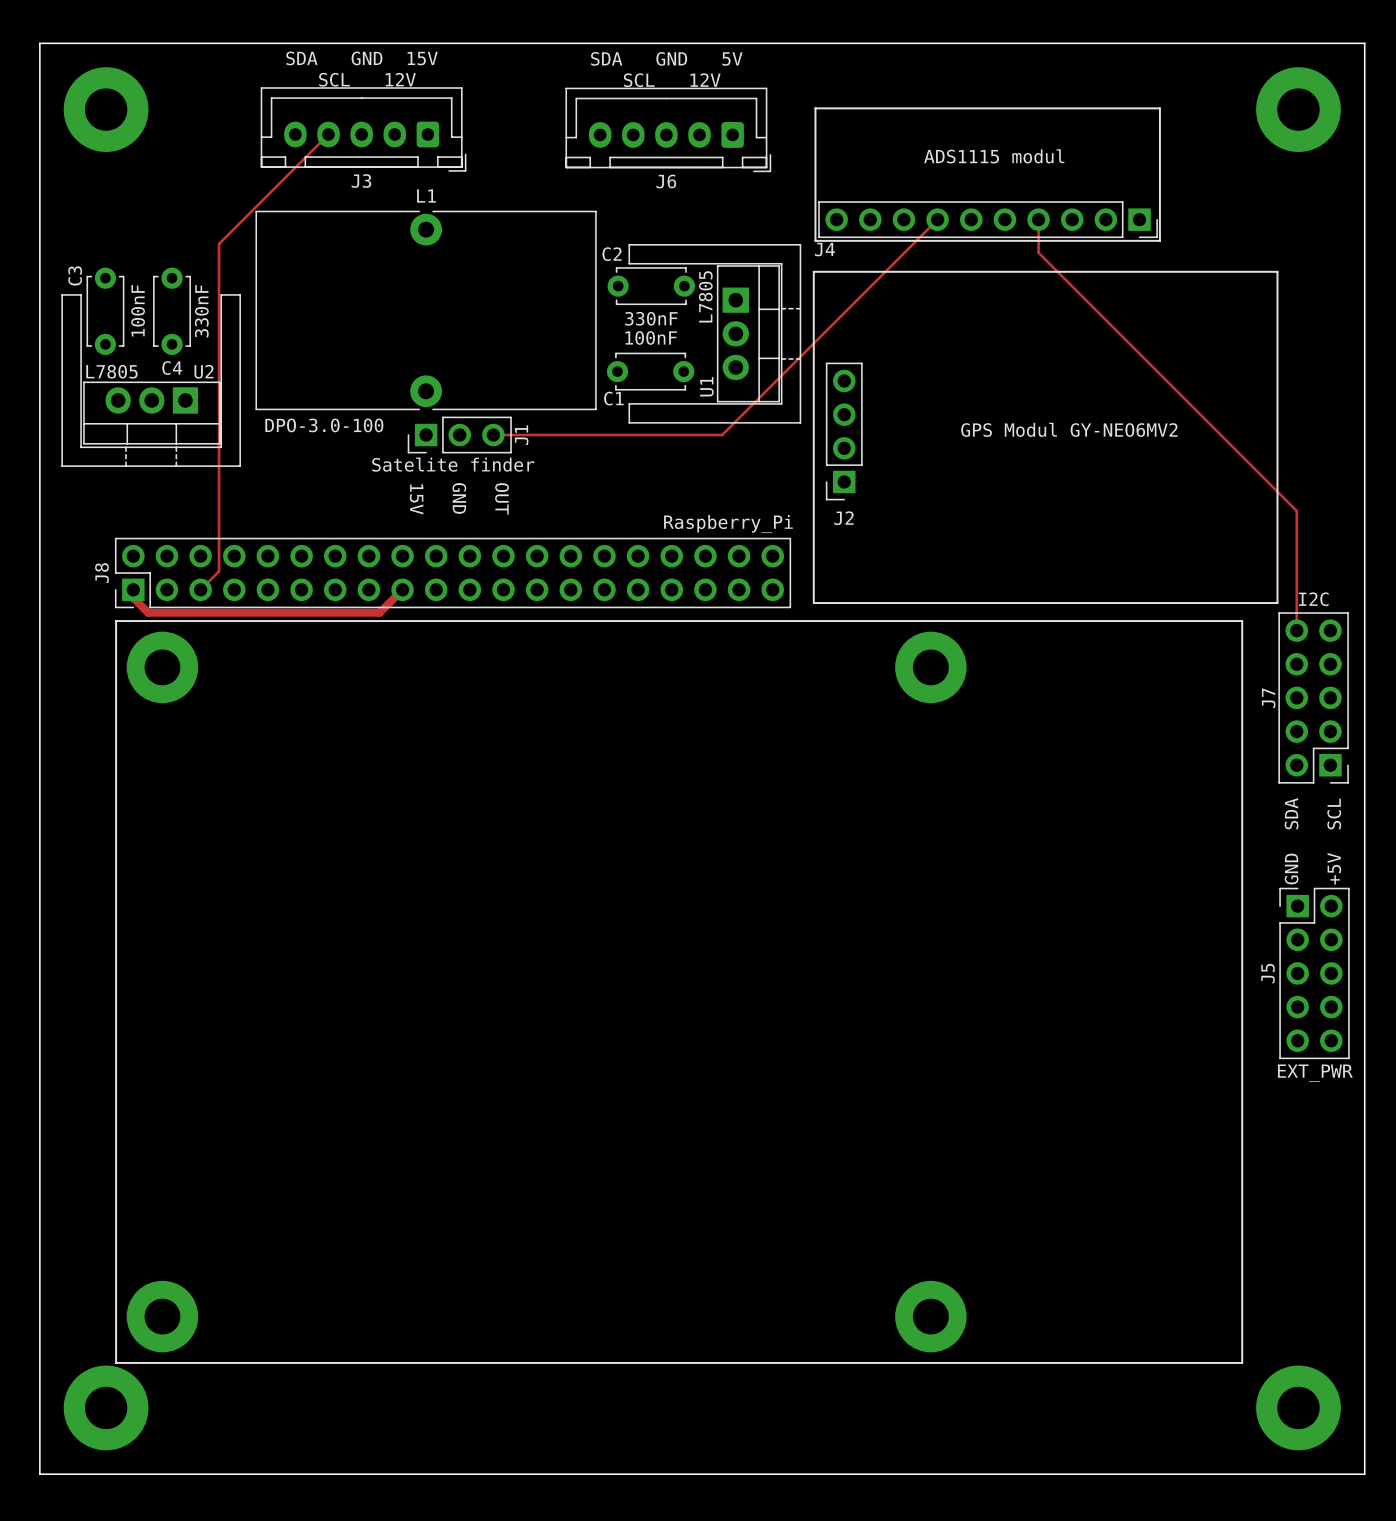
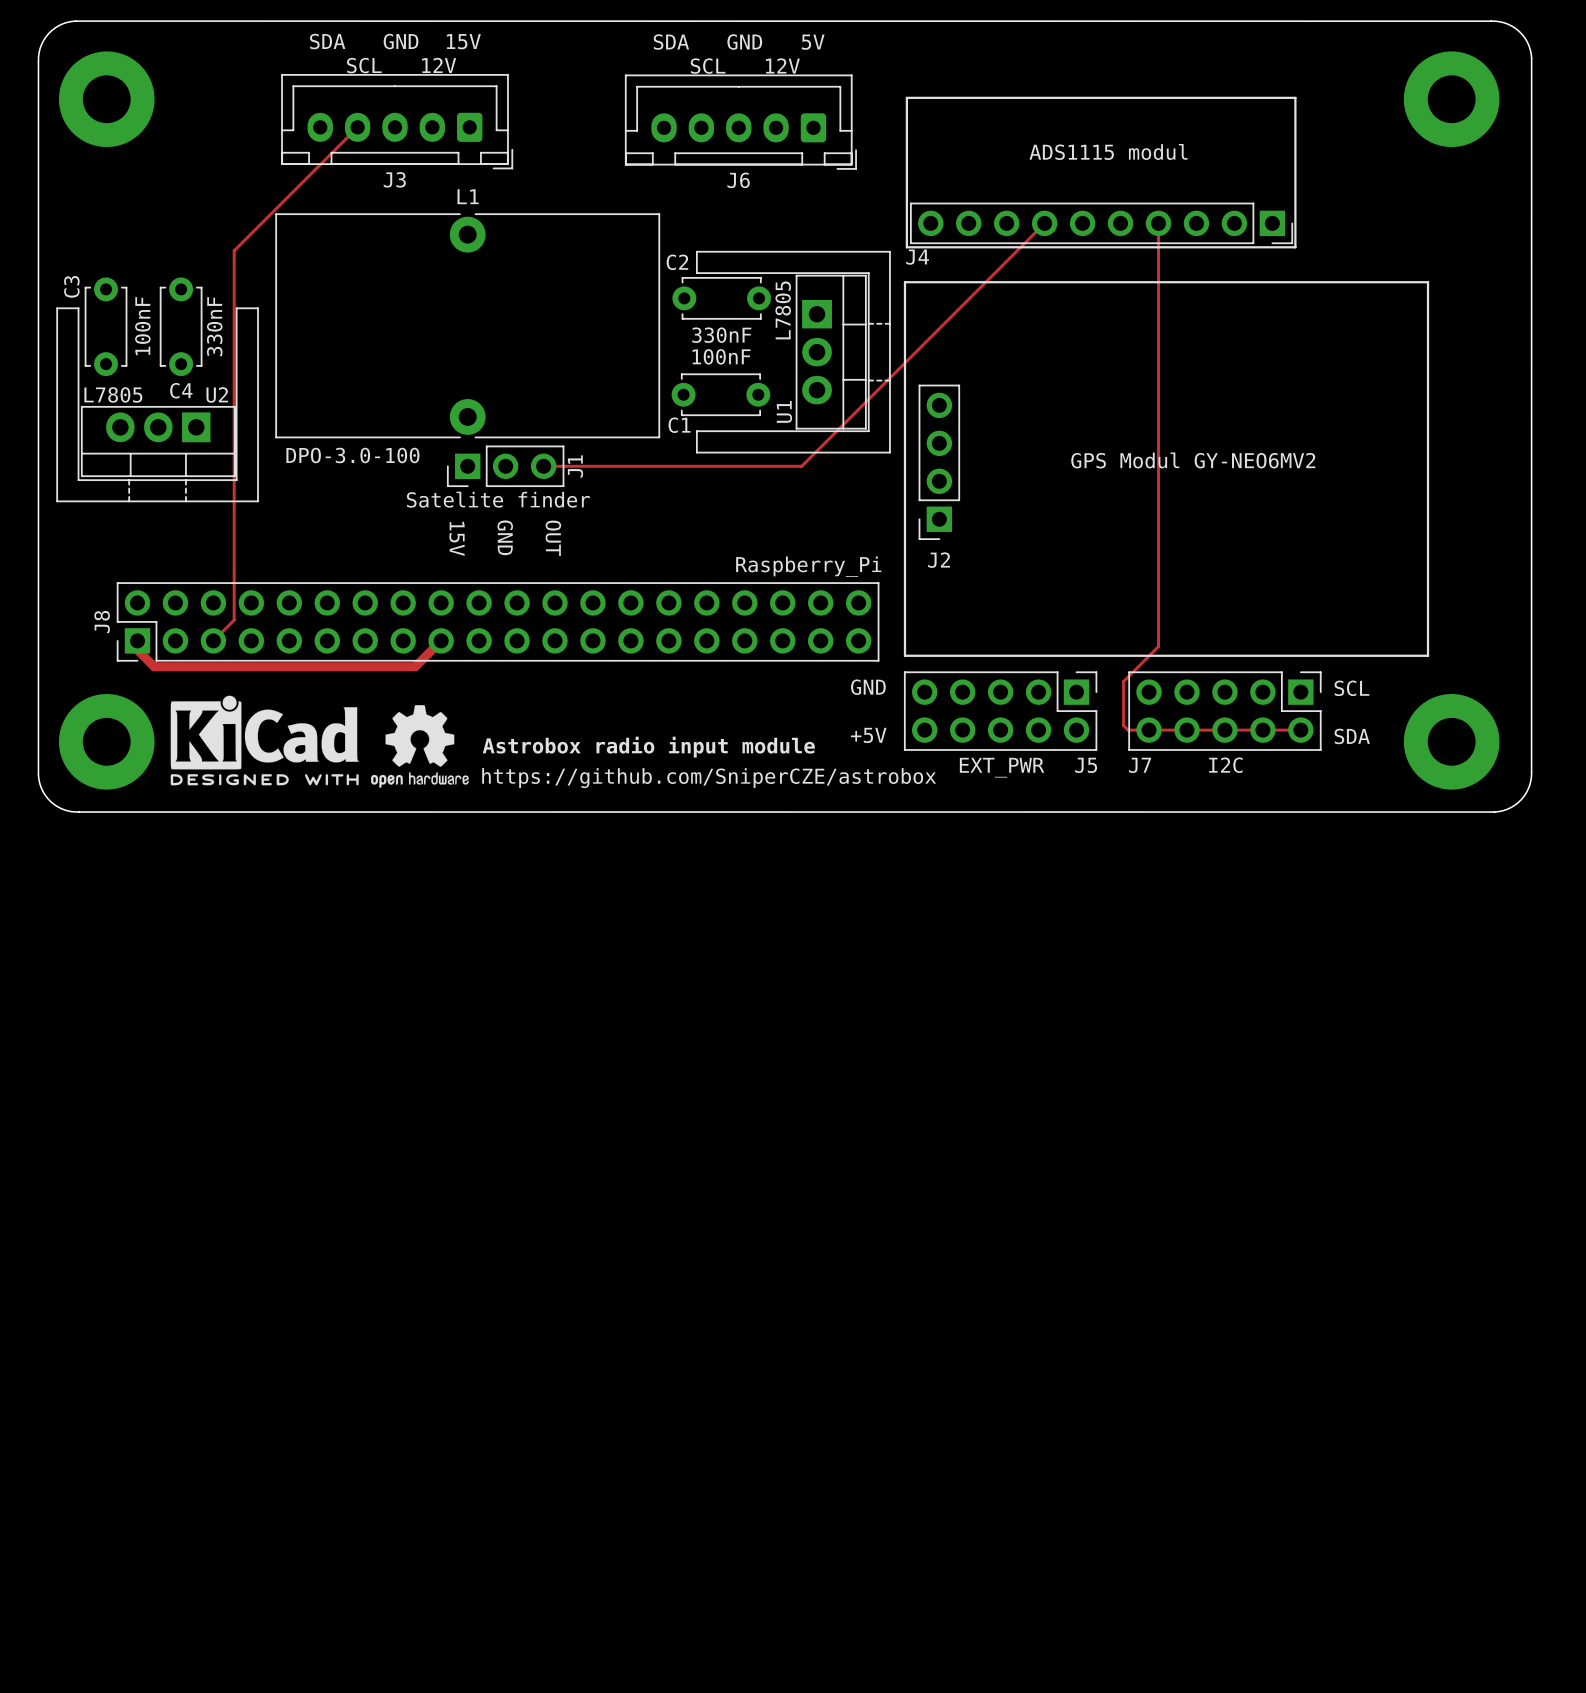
board edge: none -> (75, 21) (1491, 21) (1512, 26) (1527, 41) (1531, 58) (1531, 771) (1526, 792) (1514, 805) (1494, 812) (78, 812) (57, 806) (43, 791) (38, 774) (38, 57) (43, 40) (51, 30) (62, 23) (75, 21)
board edge: (39, 43) (1364, 43) (1364, 1474) (39, 1474) (39, 43) -> none
track: (1038, 252) (1296, 510) (1296, 630) -> (1158, 260) (1158, 646) (1123, 681) (1123, 725) (1128, 730) (1300, 730)
J7 value position: I2C (1313, 599) -> I2C (1225, 765)
line: (116, 621) (1242, 621) (1242, 1362) (116, 1362) (116, 621) -> none
text: none -> GND (868, 687)
text: none -> SCL (1351, 688)
drawing: none -> [170, 695, 469, 788]
part: (162, 667) -> none
part: (930, 667) -> none
text: none -> +5V (868, 735)
text: none -> SDA (1352, 736)
part: none -> (106, 741)
part: none -> (1451, 741)
text: none -> Astrobox radio input module (648, 747)
J7 rotation: 0° (1313, 697) -> 90° counterclockwise (1224, 711)
J7 position: (1313, 697) -> (1224, 711)
J7 name position: J7 (1268, 698) -> J7 (1140, 765)
text: none -> https://github.com/SniperCZE/astrobox (709, 778)
text: GND SDA (1291, 841) -> none
text: +5V SCL (1334, 841) -> none
J5 name position: J5 (1268, 973) -> J5 (1086, 765)
J5 rotation: 0° (1314, 973) -> 90° clockwise (1000, 711)
J5 position: (1314, 973) -> (1000, 711)
J5 value position: EXT_PWR (1315, 1073) -> EXT_PWR (1002, 767)
part: (162, 1316) -> none
part: (930, 1316) -> none
part: (106, 1407) -> none
part: (1298, 1407) -> none

